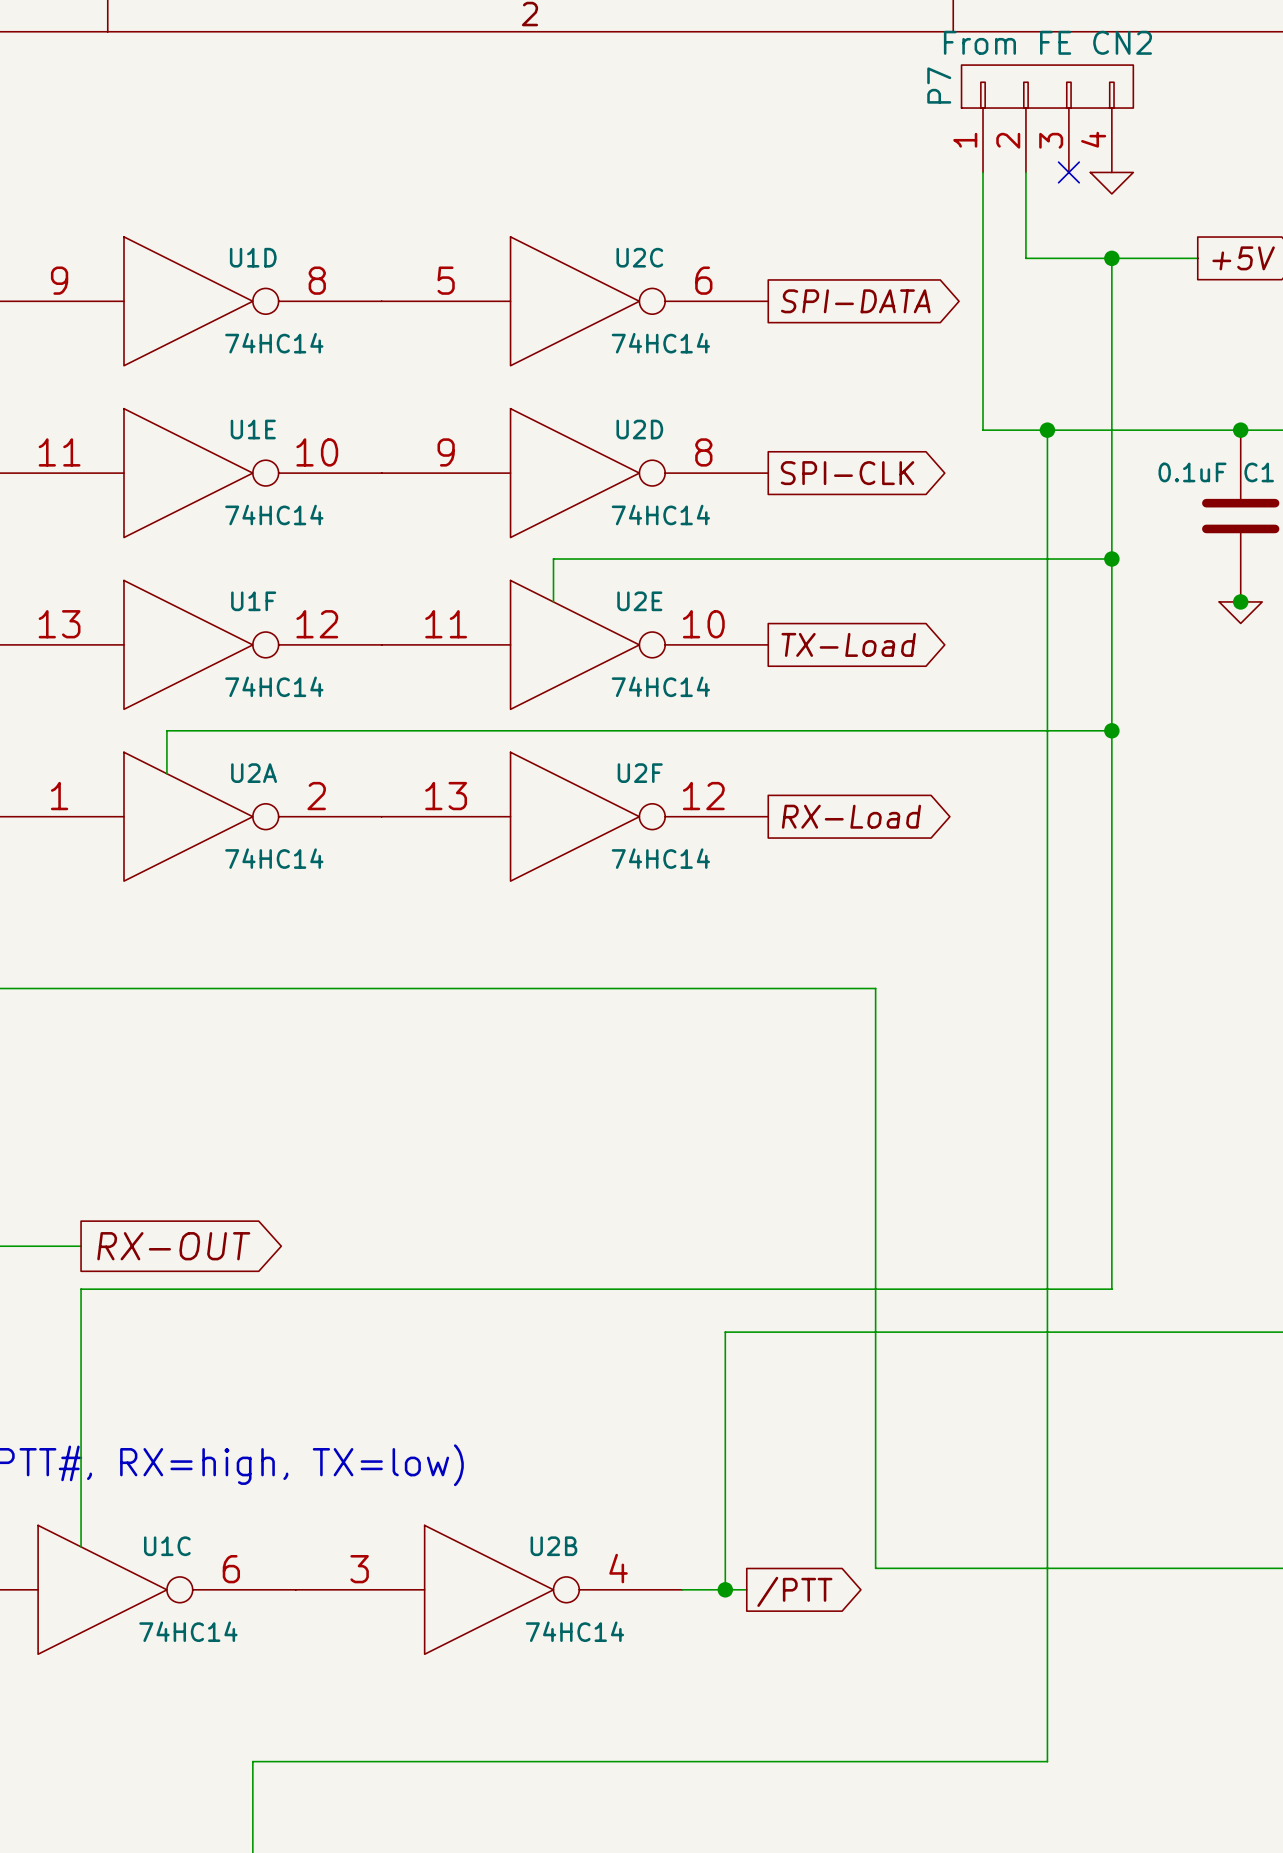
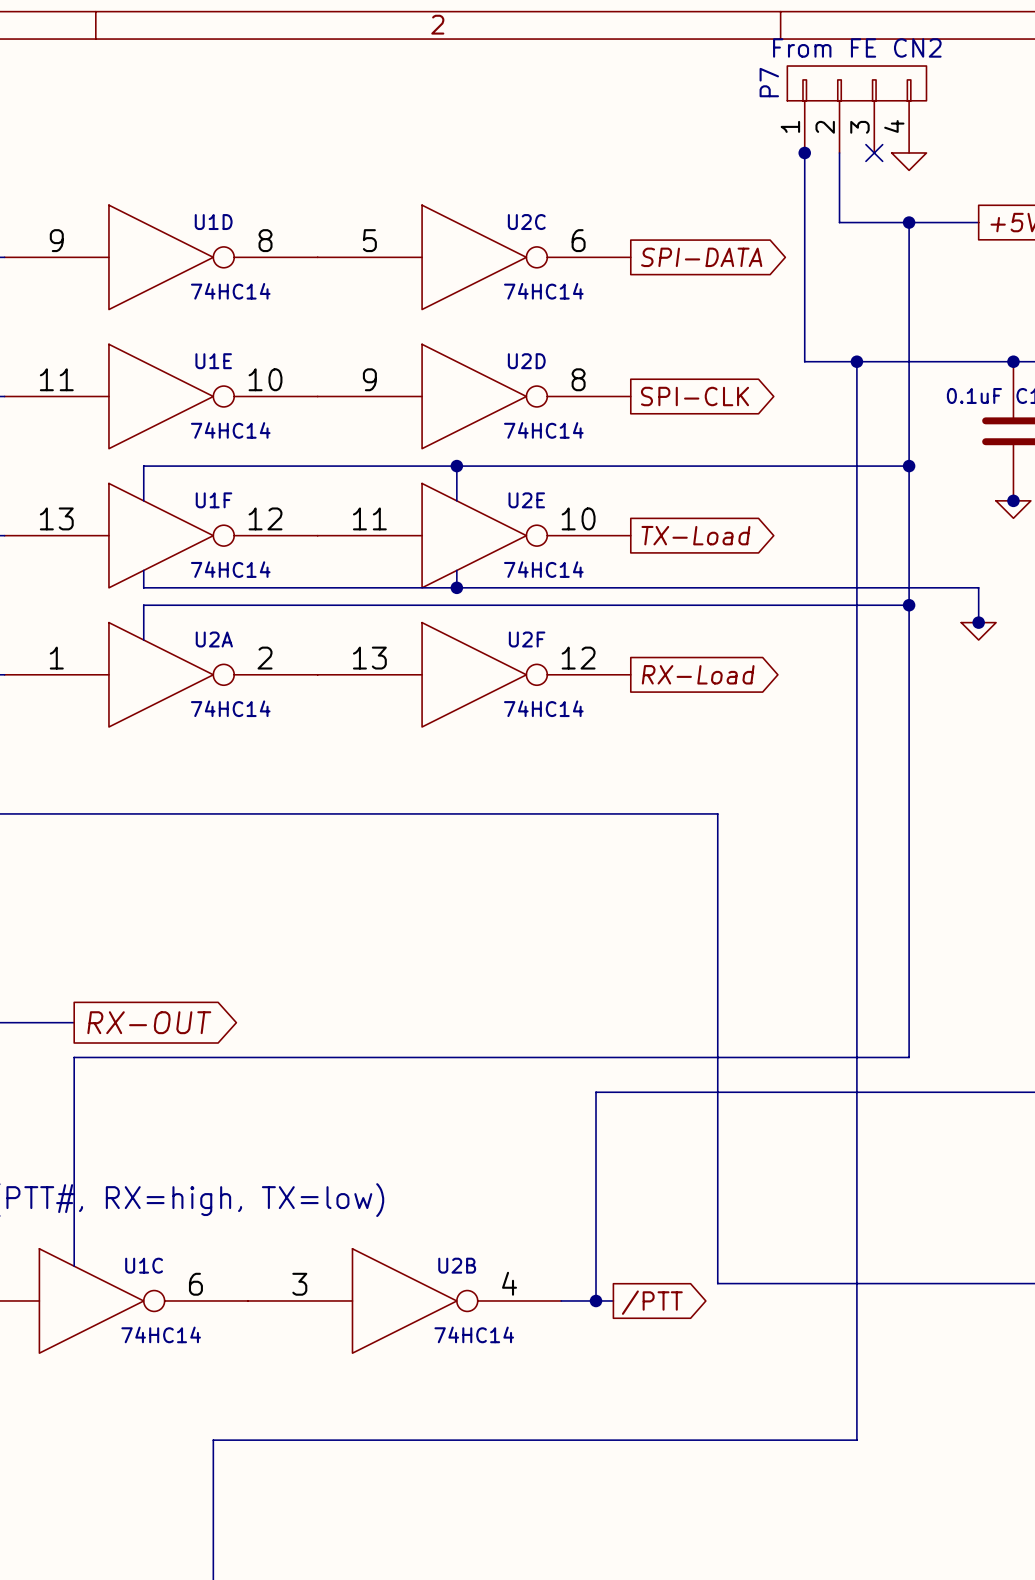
junction: none -> (804, 152)
wire: none -> (456, 466) (143, 466) (143, 500)
junction: none -> (456, 466)
wire: none -> (143, 570) (143, 587) (978, 587) (978, 622)
wire: none -> (456, 570) (456, 587)
junction: none -> (456, 587)
junction: none -> (978, 622)
power symbol: none -> (978, 631)

